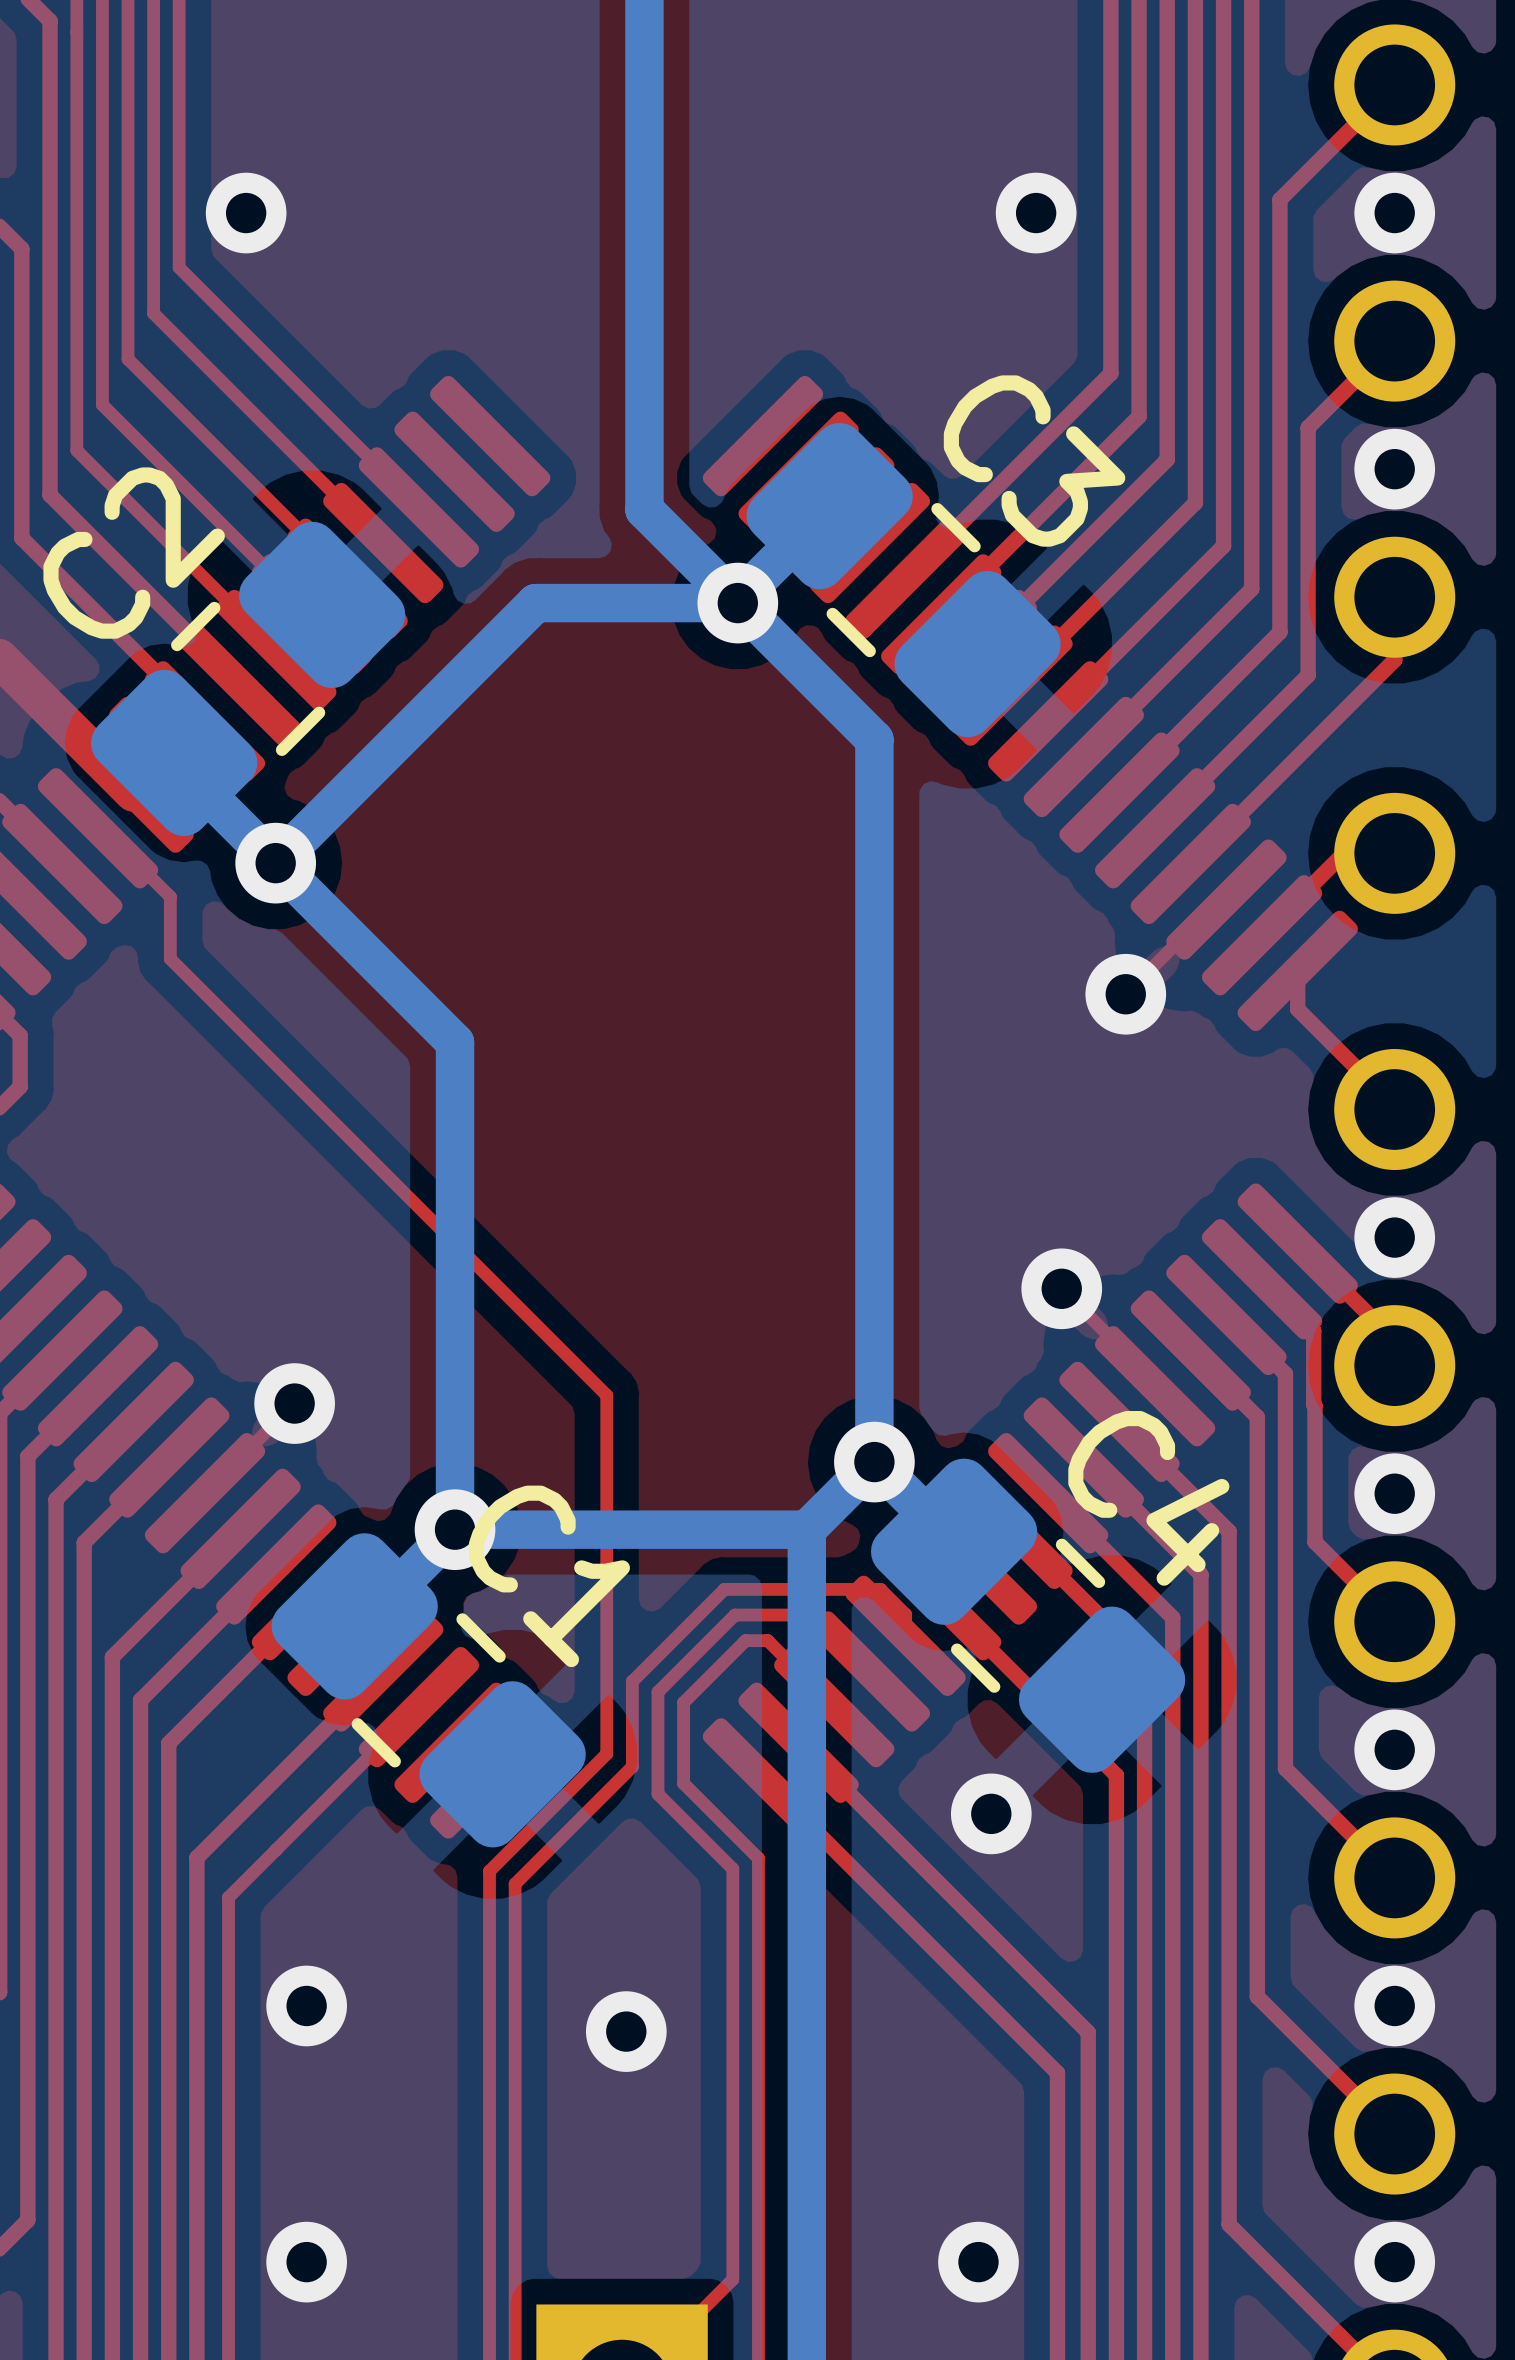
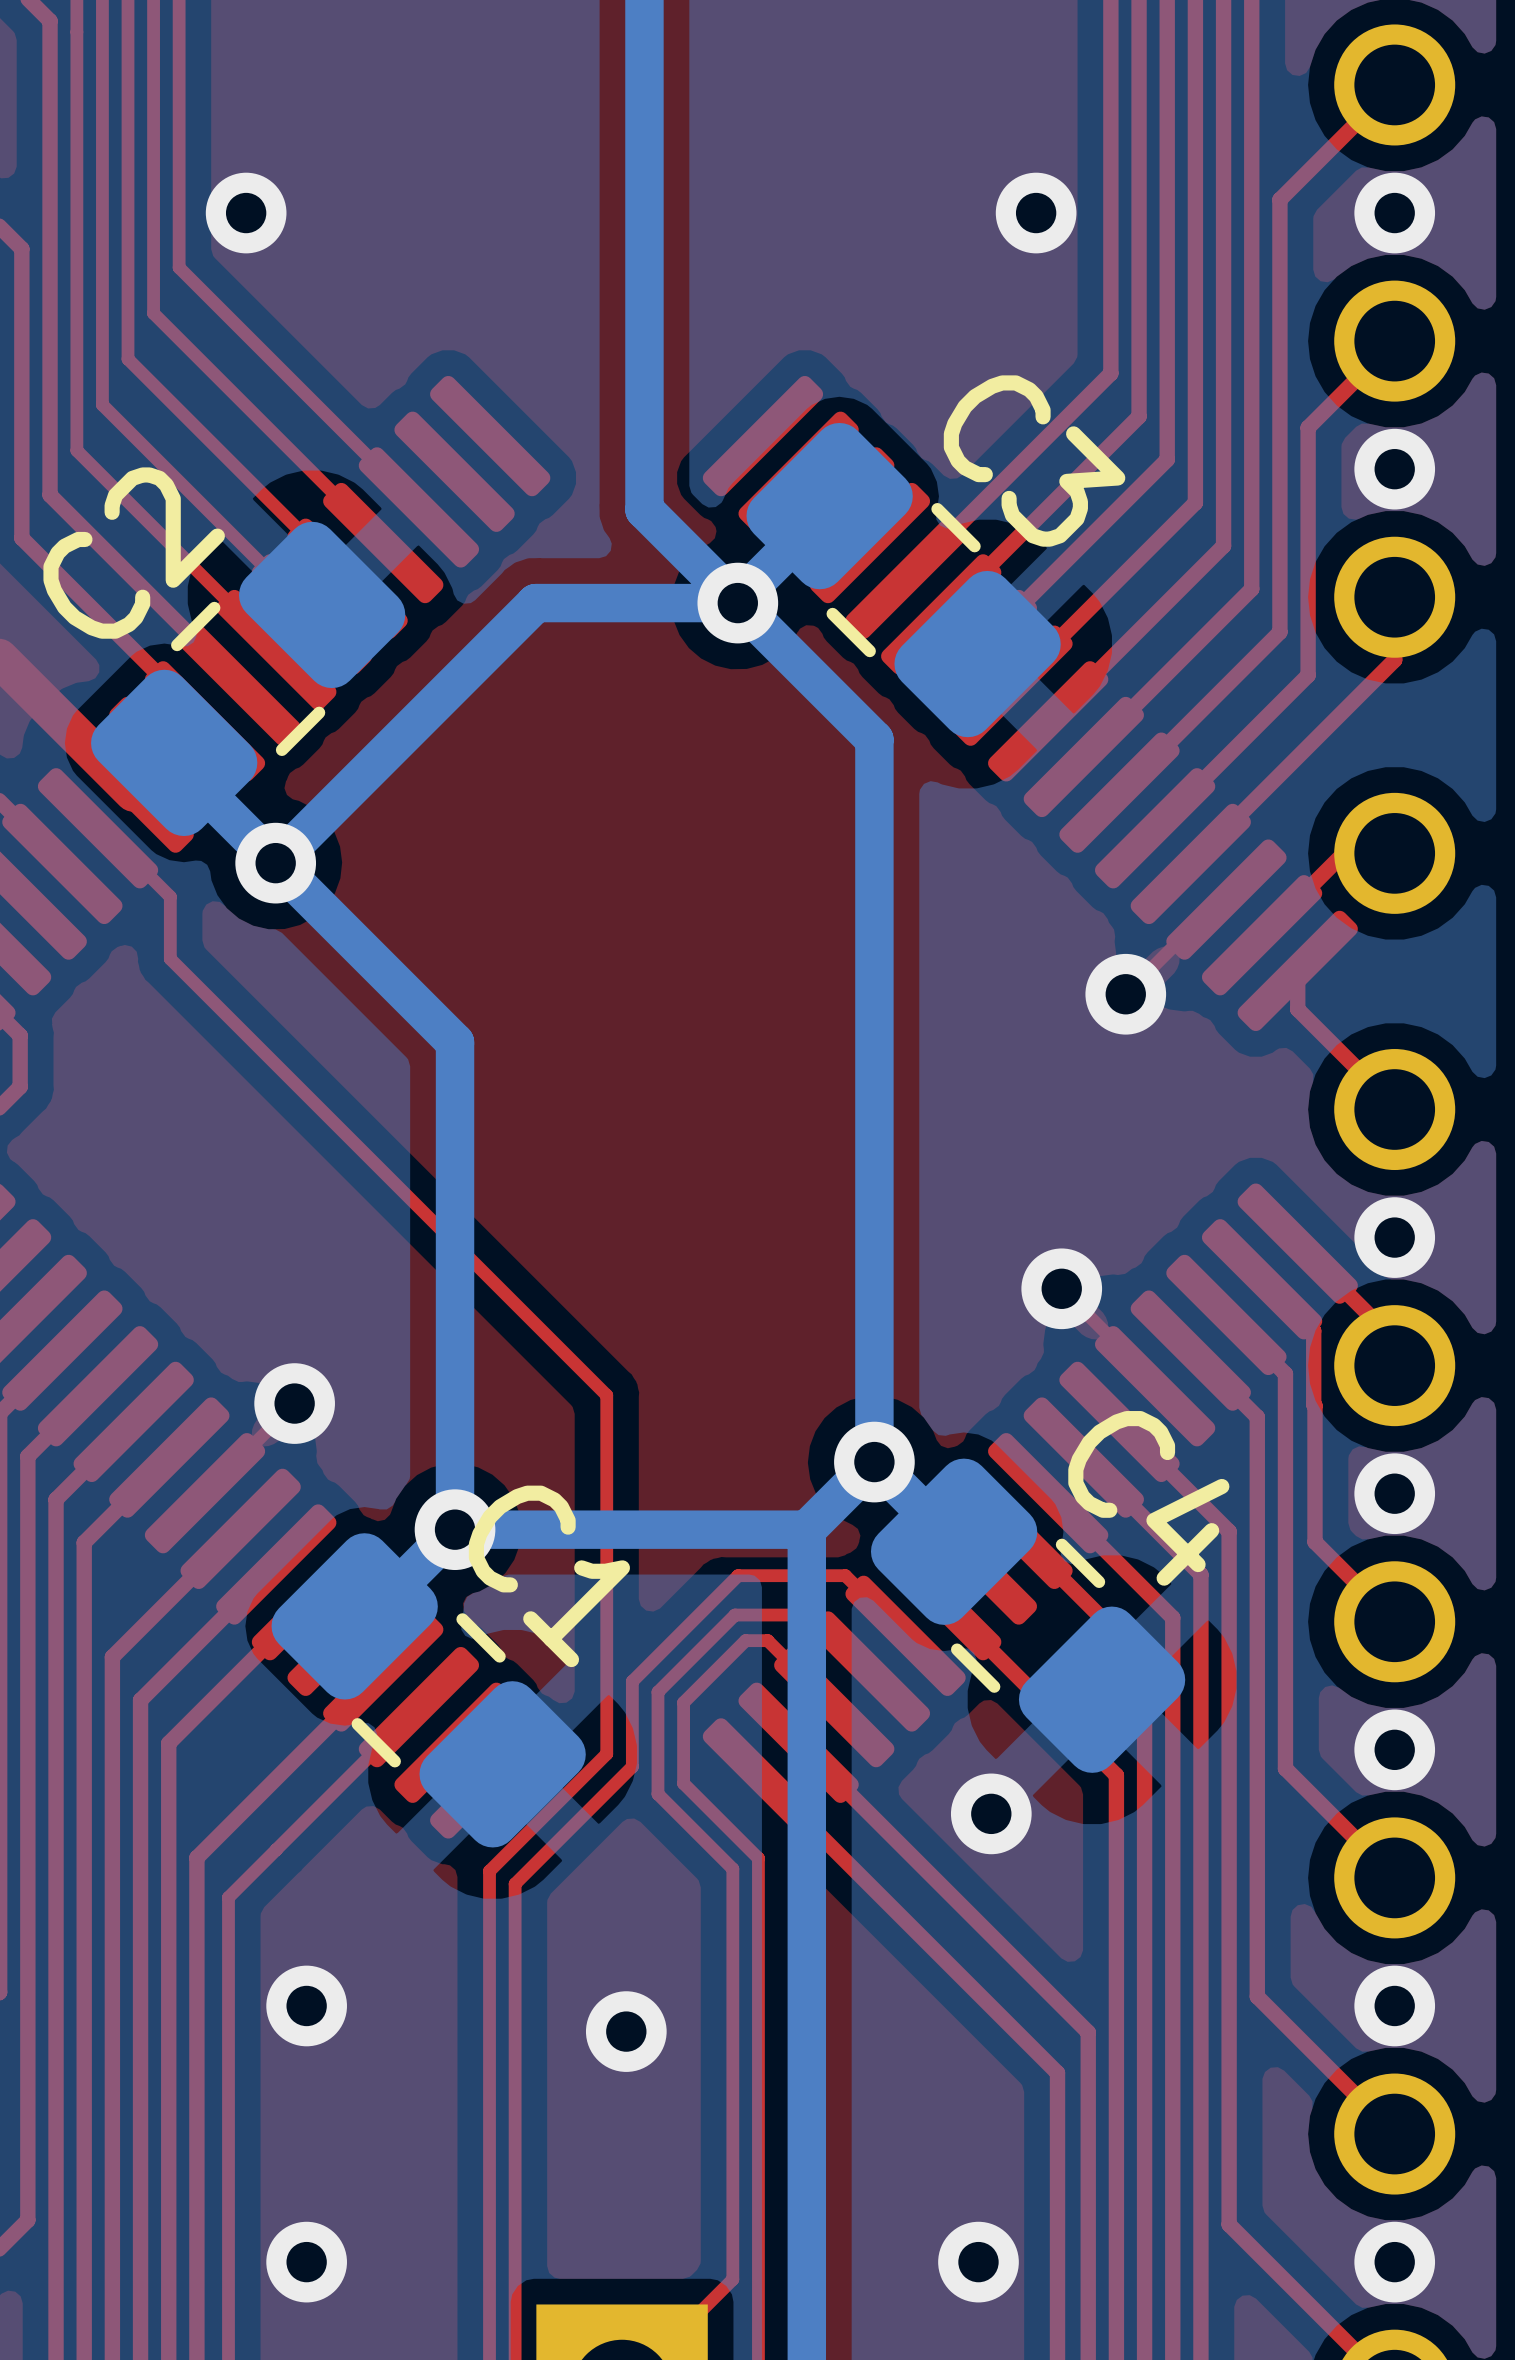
top track: (724, 1589) (880, 1589) (905, 1614) (905, 1635) -> (724, 1589) (738, 1575) (845, 1575) (905, 1635)

